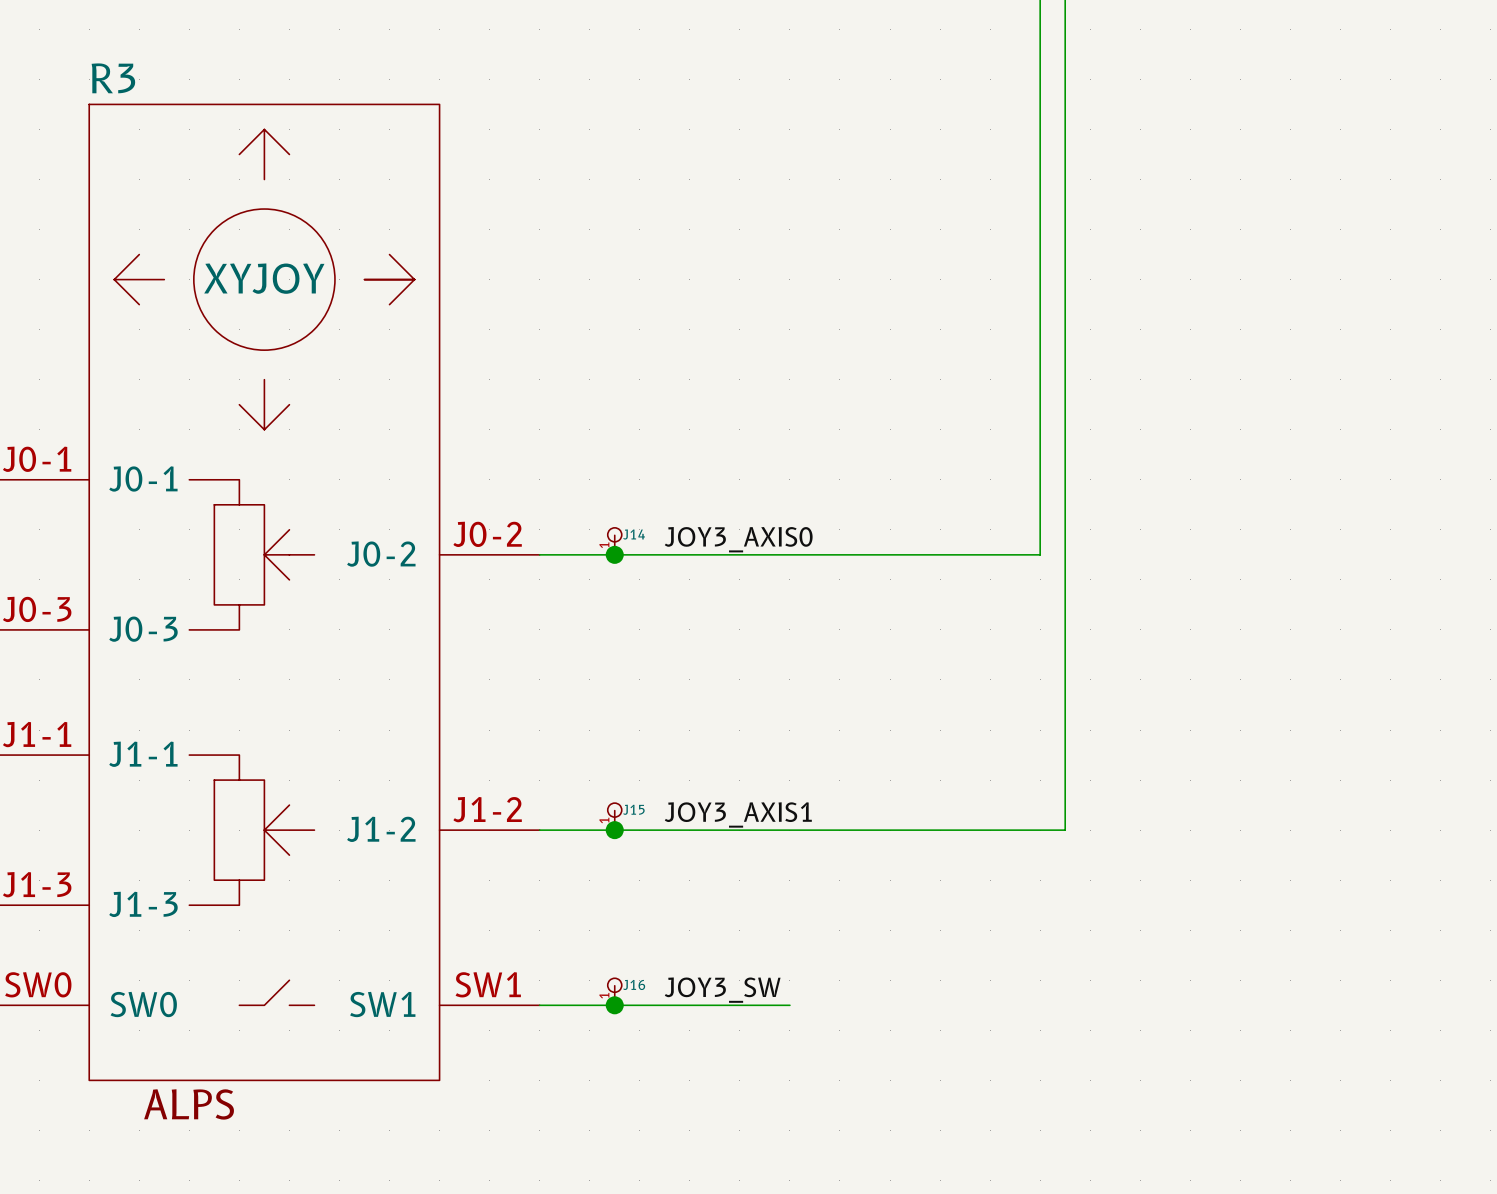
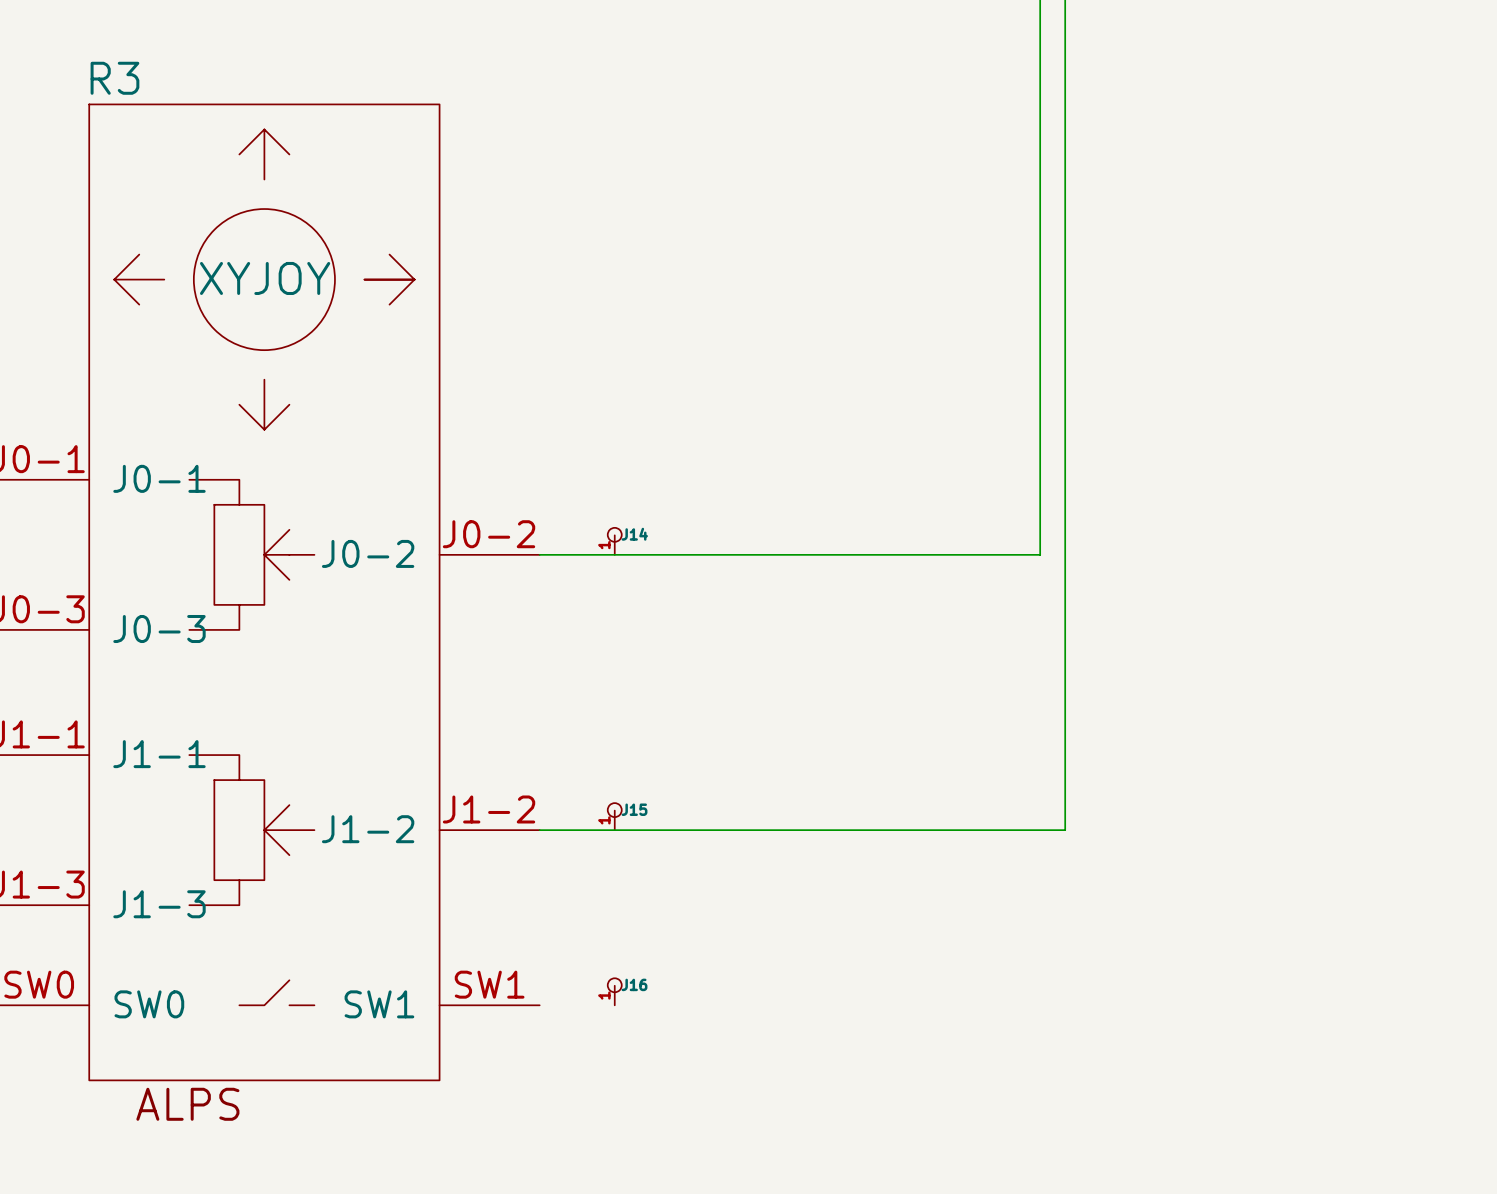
label: JOY3_AXIS0 (738, 539) -> none
junction: (614, 554) -> none
label: JOY3_AXIS1 (738, 814) -> none
junction: (614, 830) -> none
label: JOY3_SW (722, 990) -> none
wire: (539, 1005) (789, 1005) -> none
junction: (614, 1005) -> none

